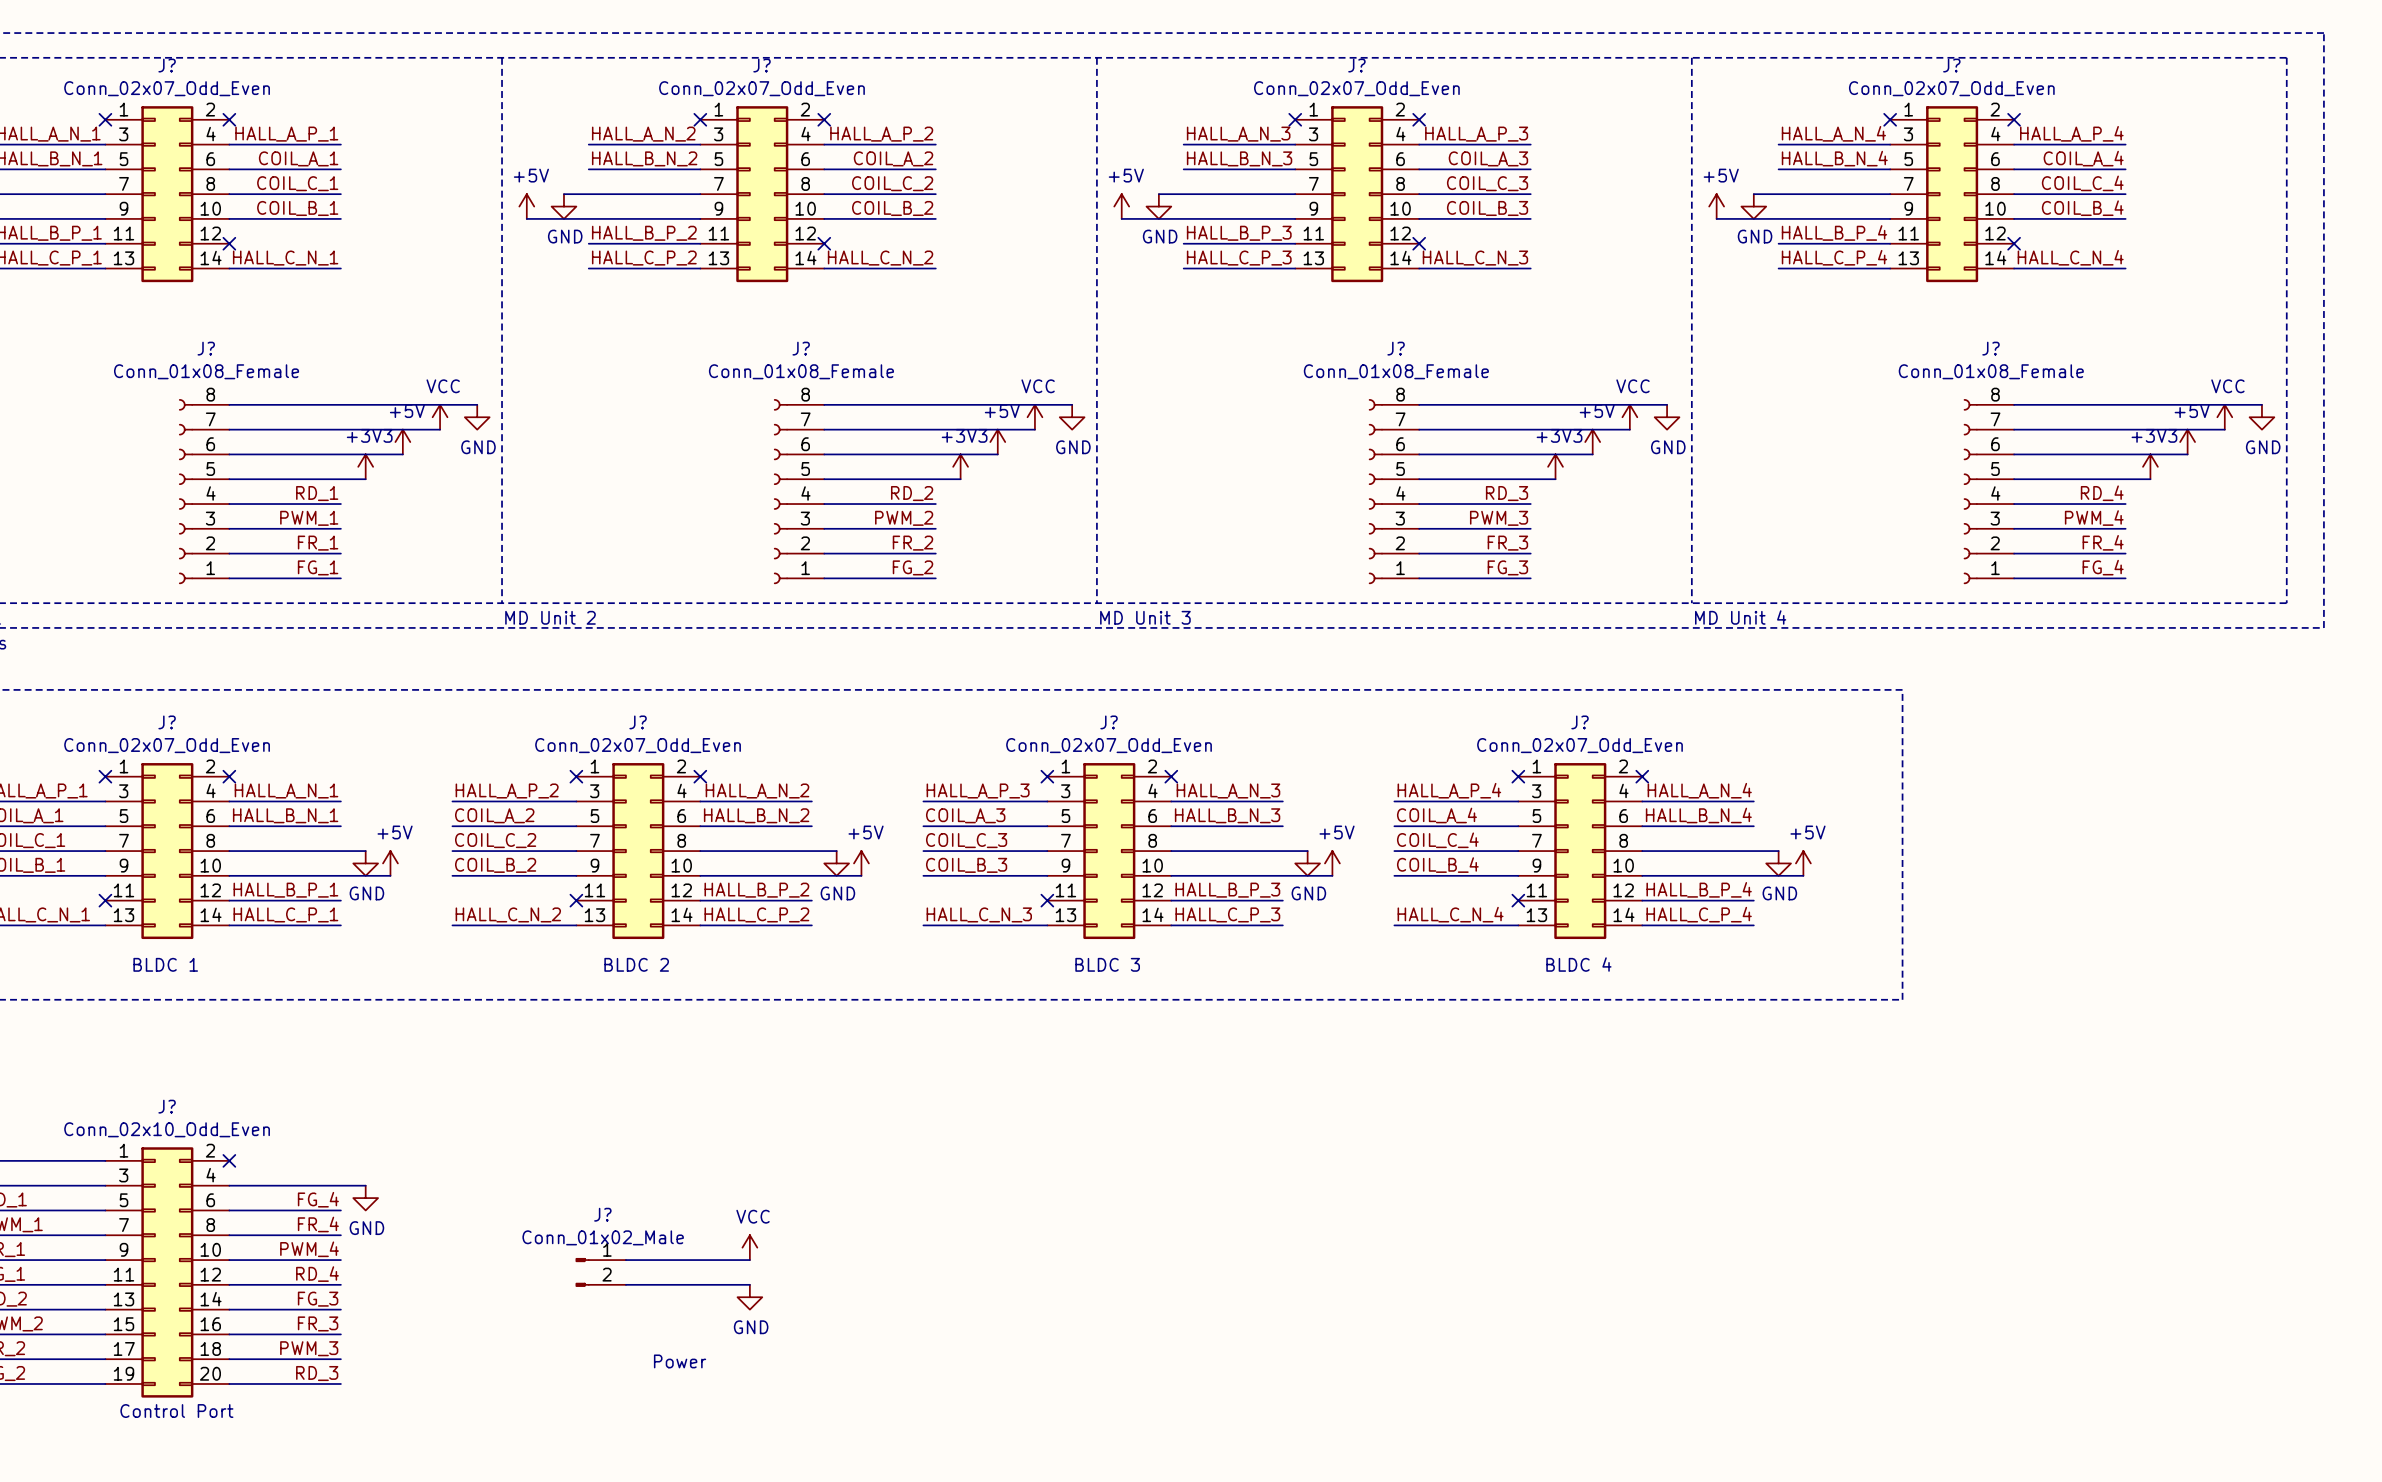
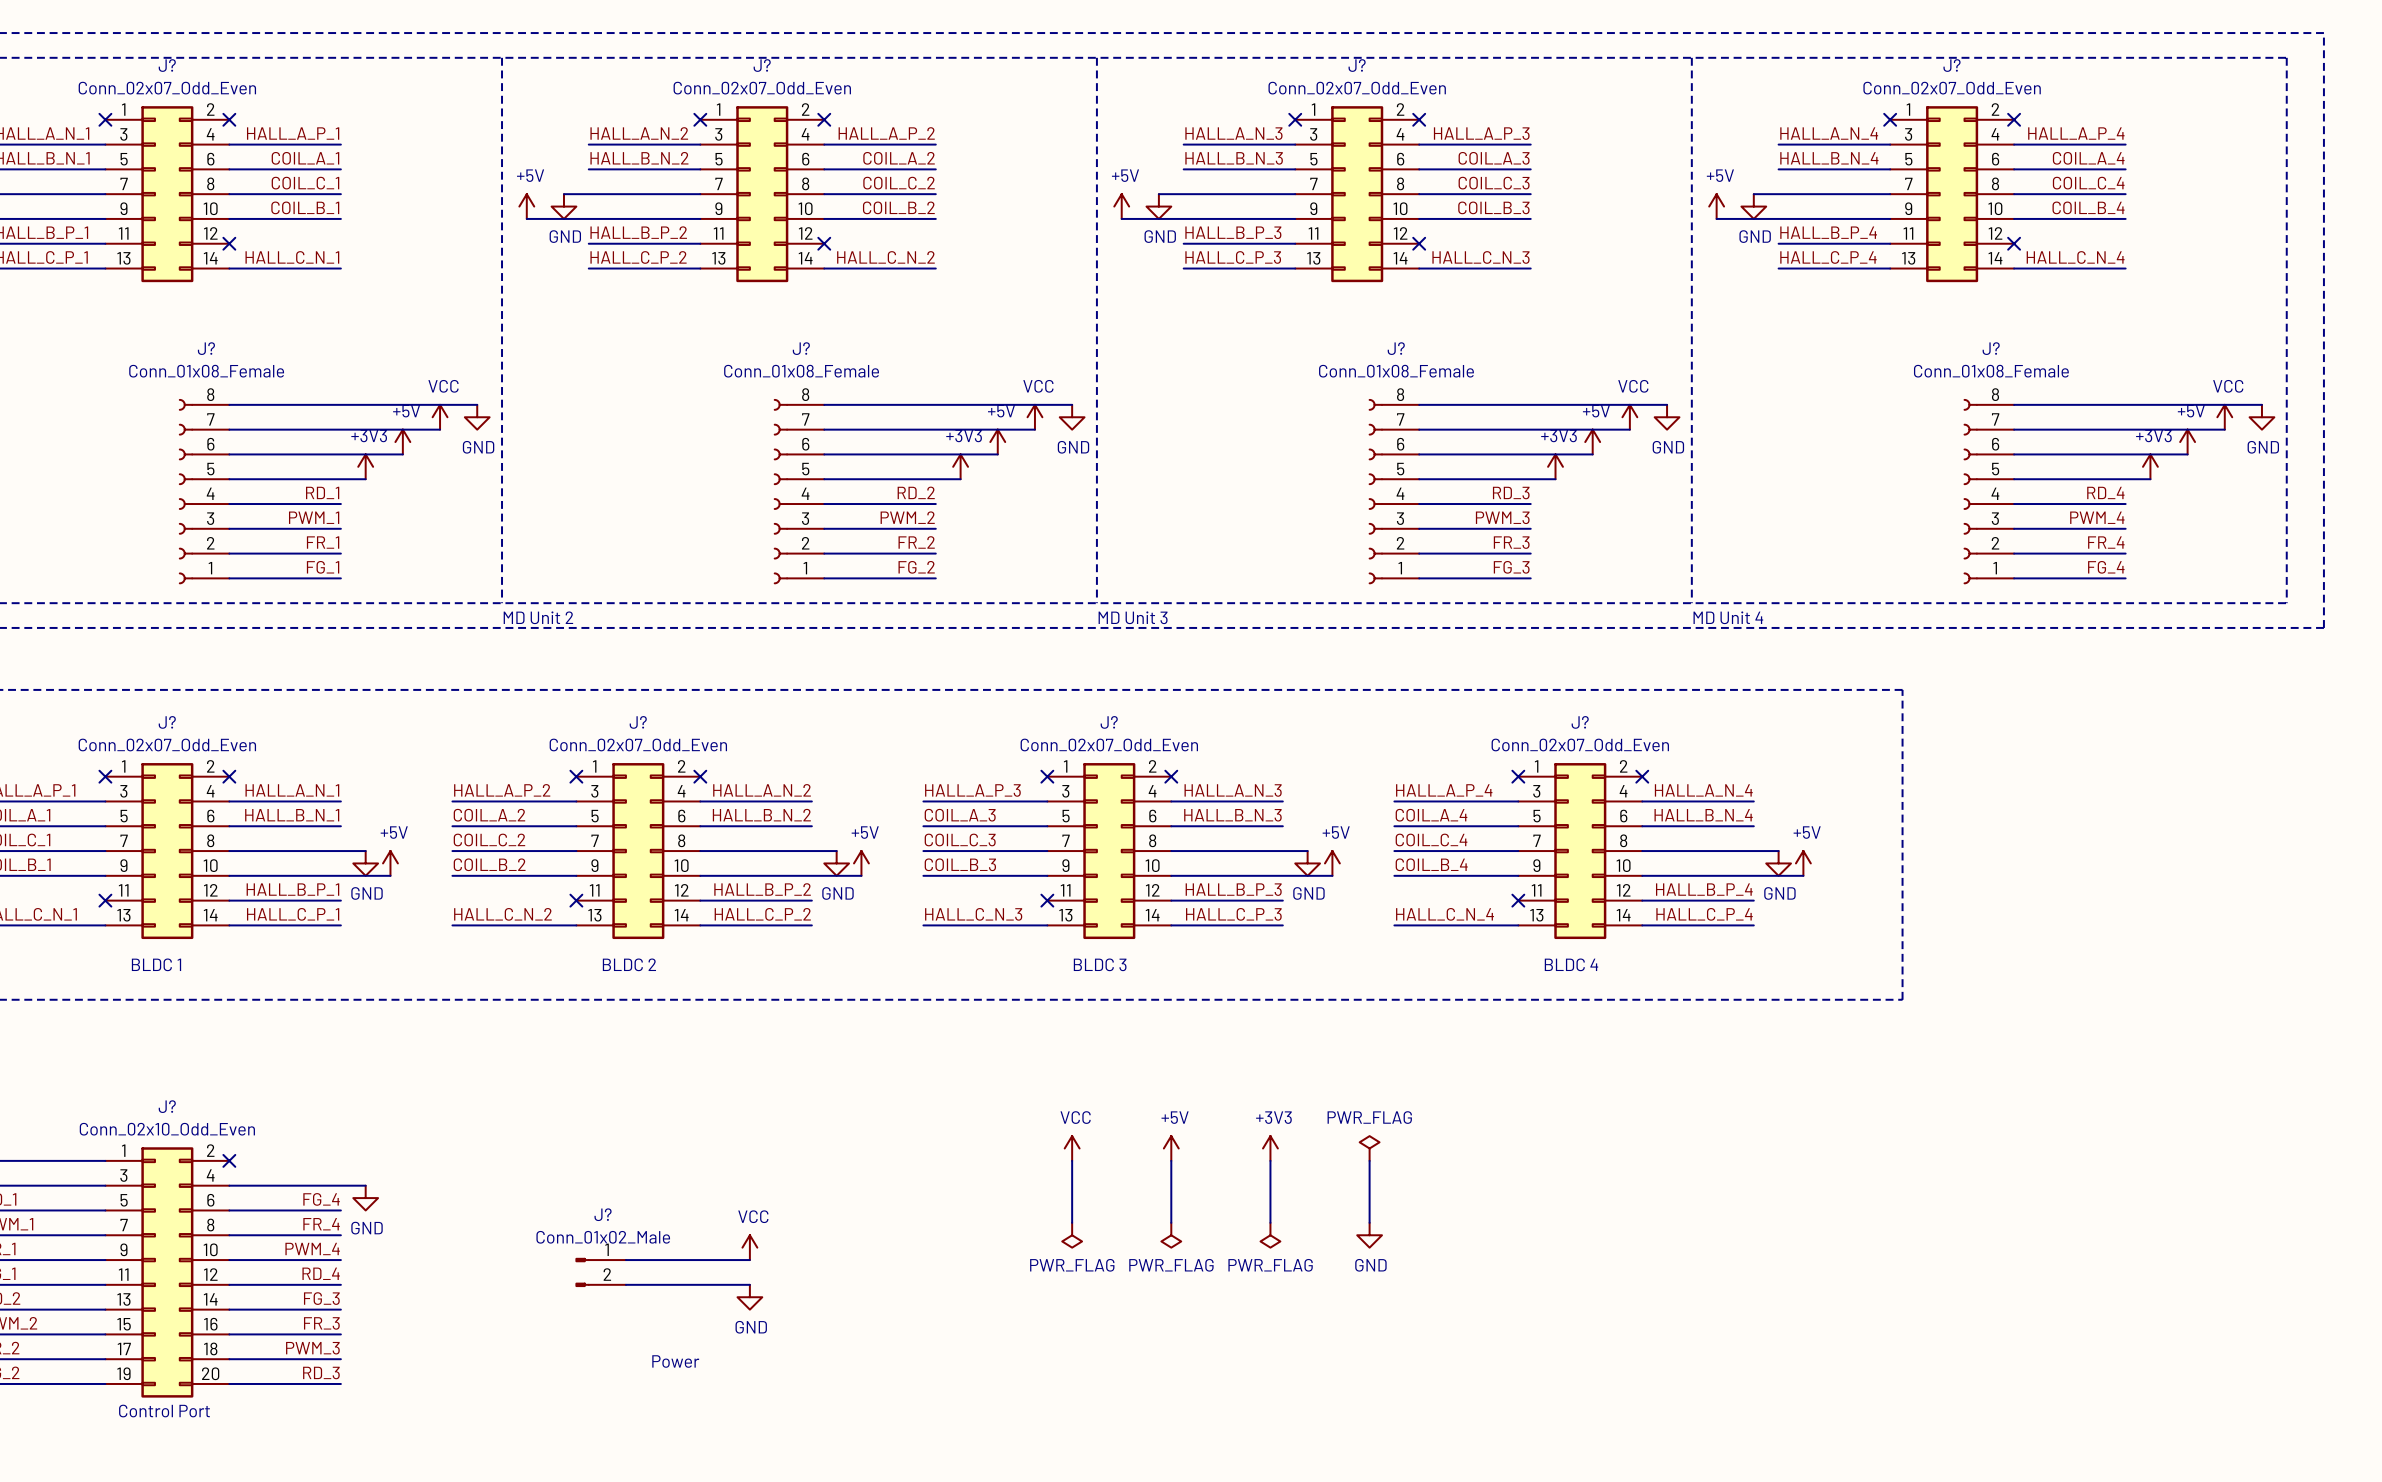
power symbol: none -> VCC (1072, 1148)
power symbol: none -> +5V (1171, 1148)
power symbol: none -> +3V3 (1270, 1148)
power symbol: none -> PWR_FLAG (1369, 1148)
wire: none -> (1072, 1160) (1072, 1222)
wire: none -> (1171, 1160) (1171, 1222)
wire: none -> (1270, 1160) (1270, 1222)
wire: none -> (1369, 1160) (1369, 1222)
power symbol: none -> PWR_FLAG (1072, 1235)
power symbol: none -> PWR_FLAG (1171, 1235)
power symbol: none -> PWR_FLAG (1270, 1235)
power symbol: none -> GND (1369, 1235)

